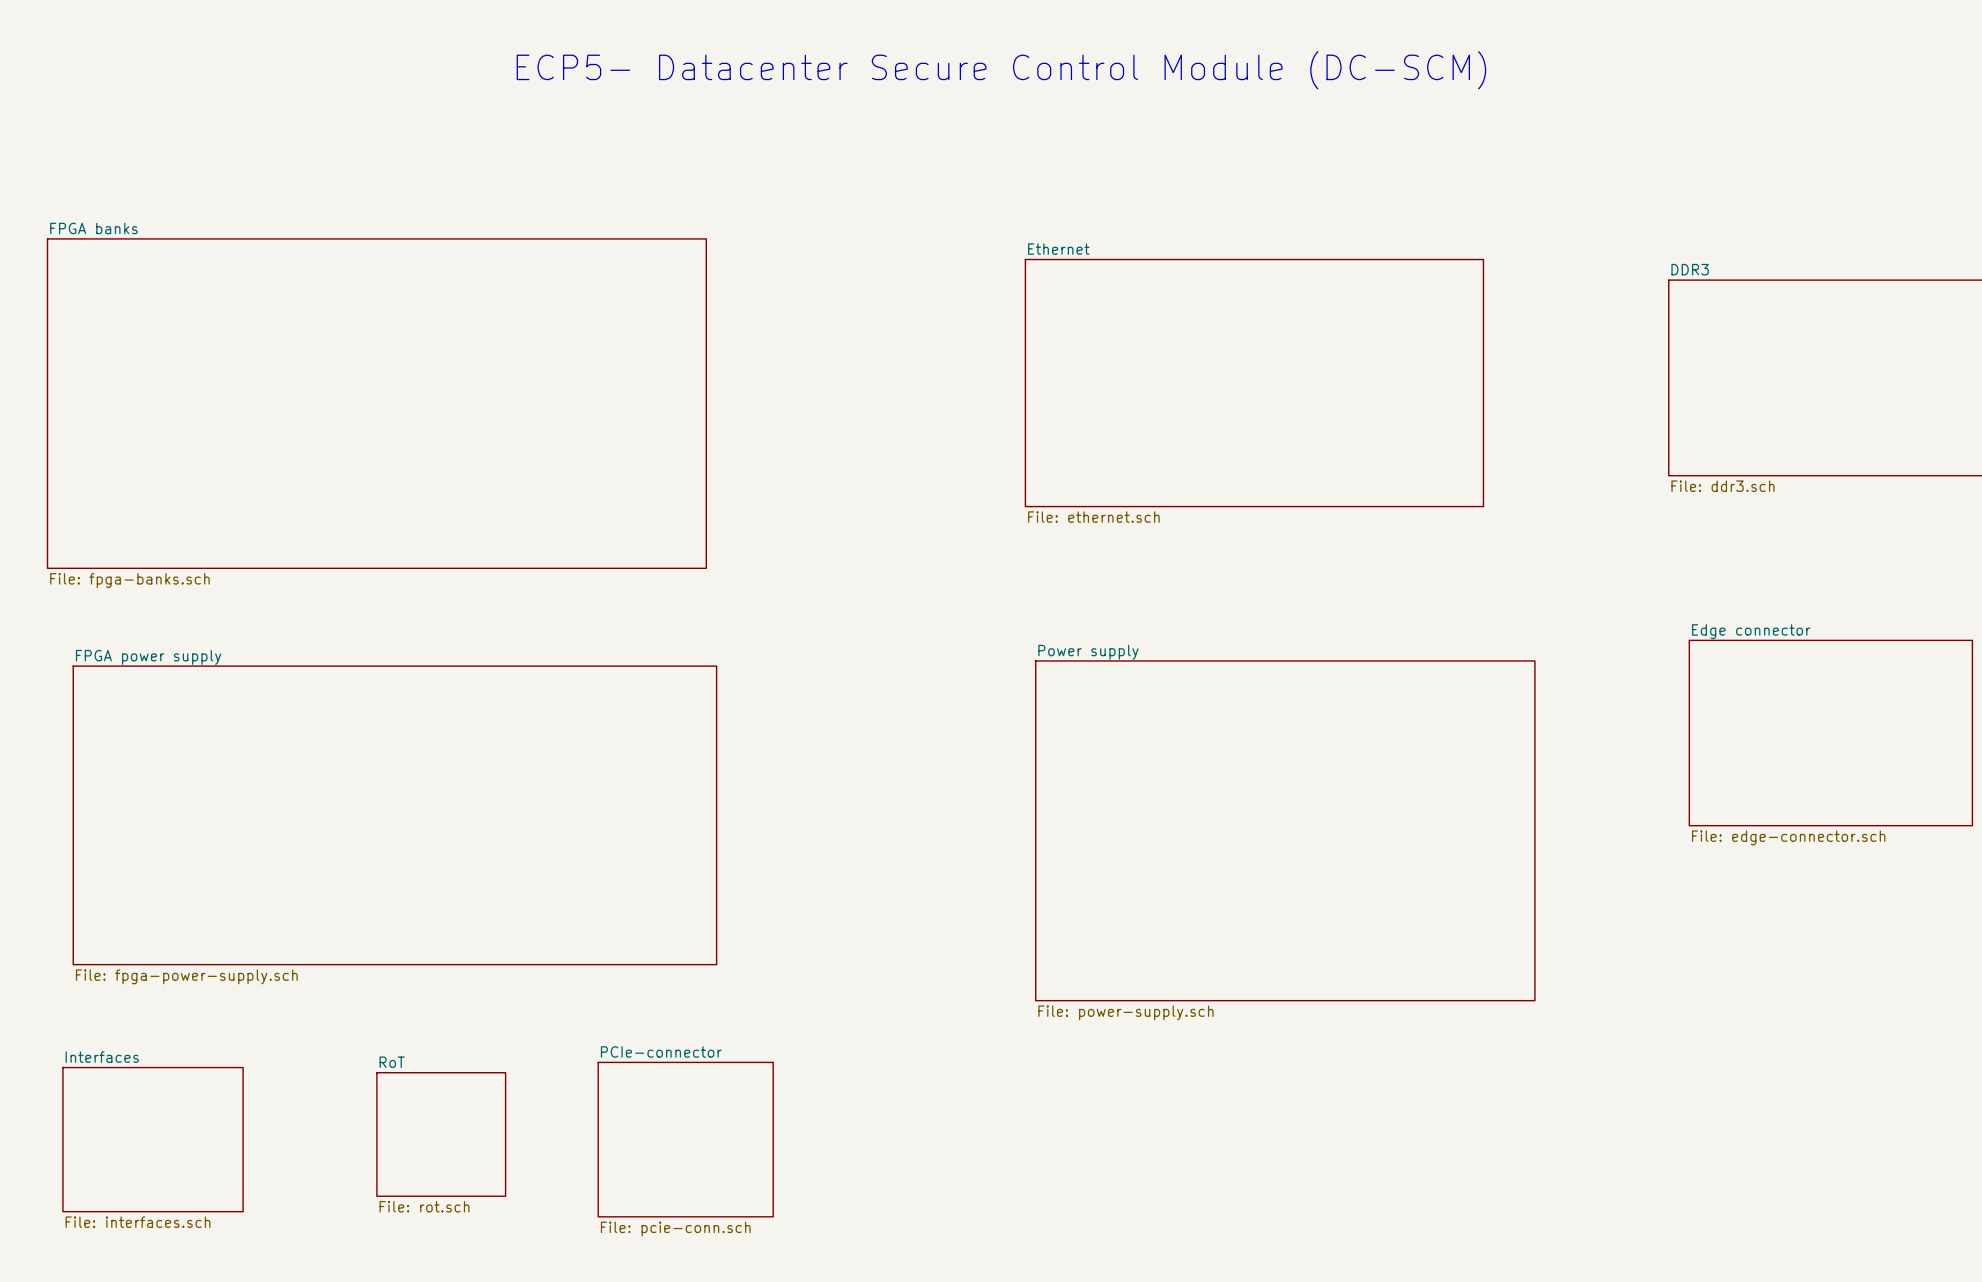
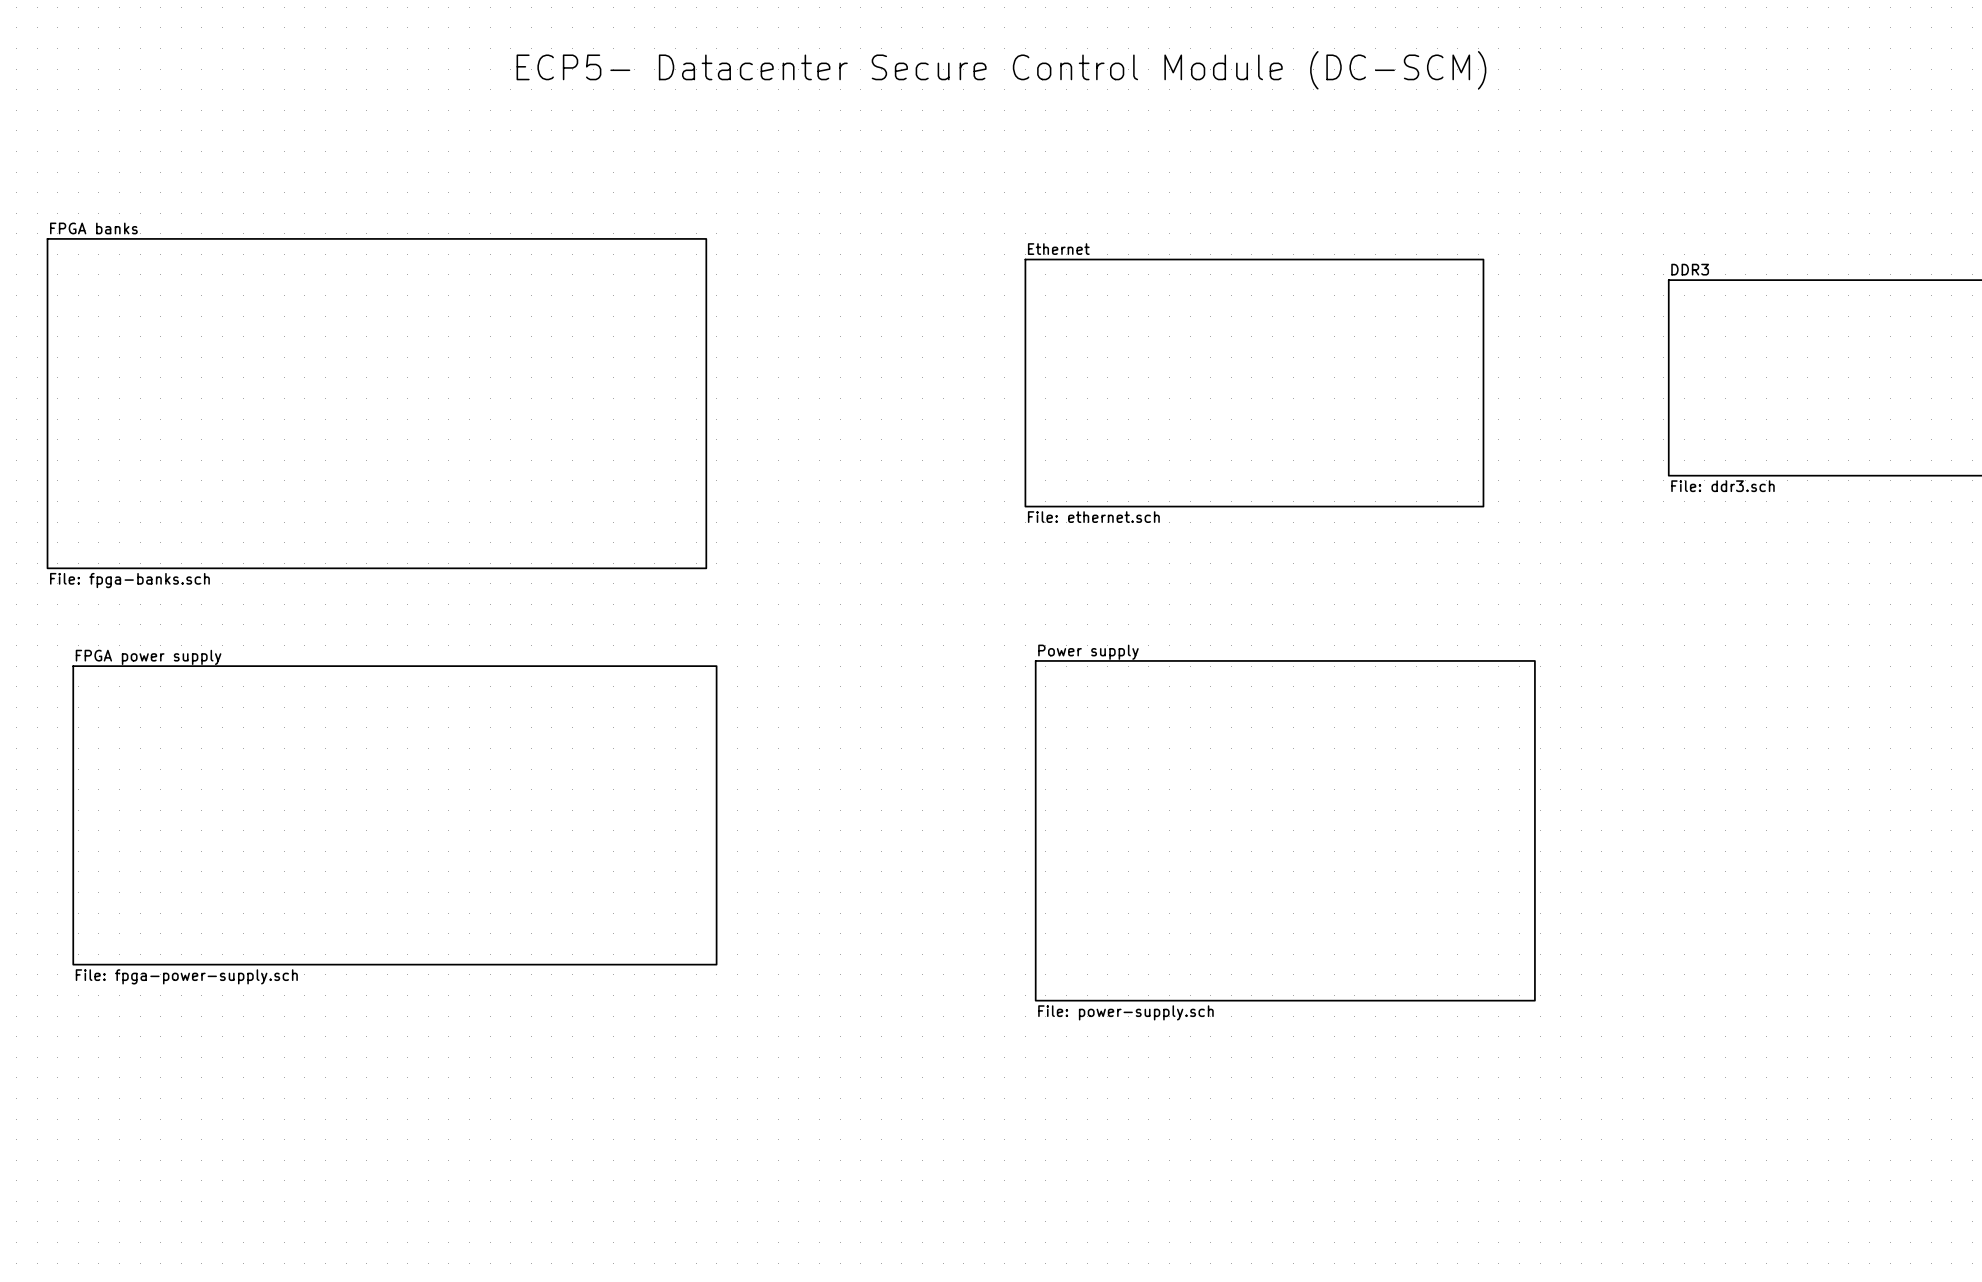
sheet Edge connector: File: edge-connector.sch (1830, 733) -> none
sheet RoT: File: rot.sch (441, 1134) -> none
sheet Interfaces: File: interfaces.sch (153, 1139) -> none
sheet PCIe-connector: File: pcie-conn.sch (685, 1139) -> none

